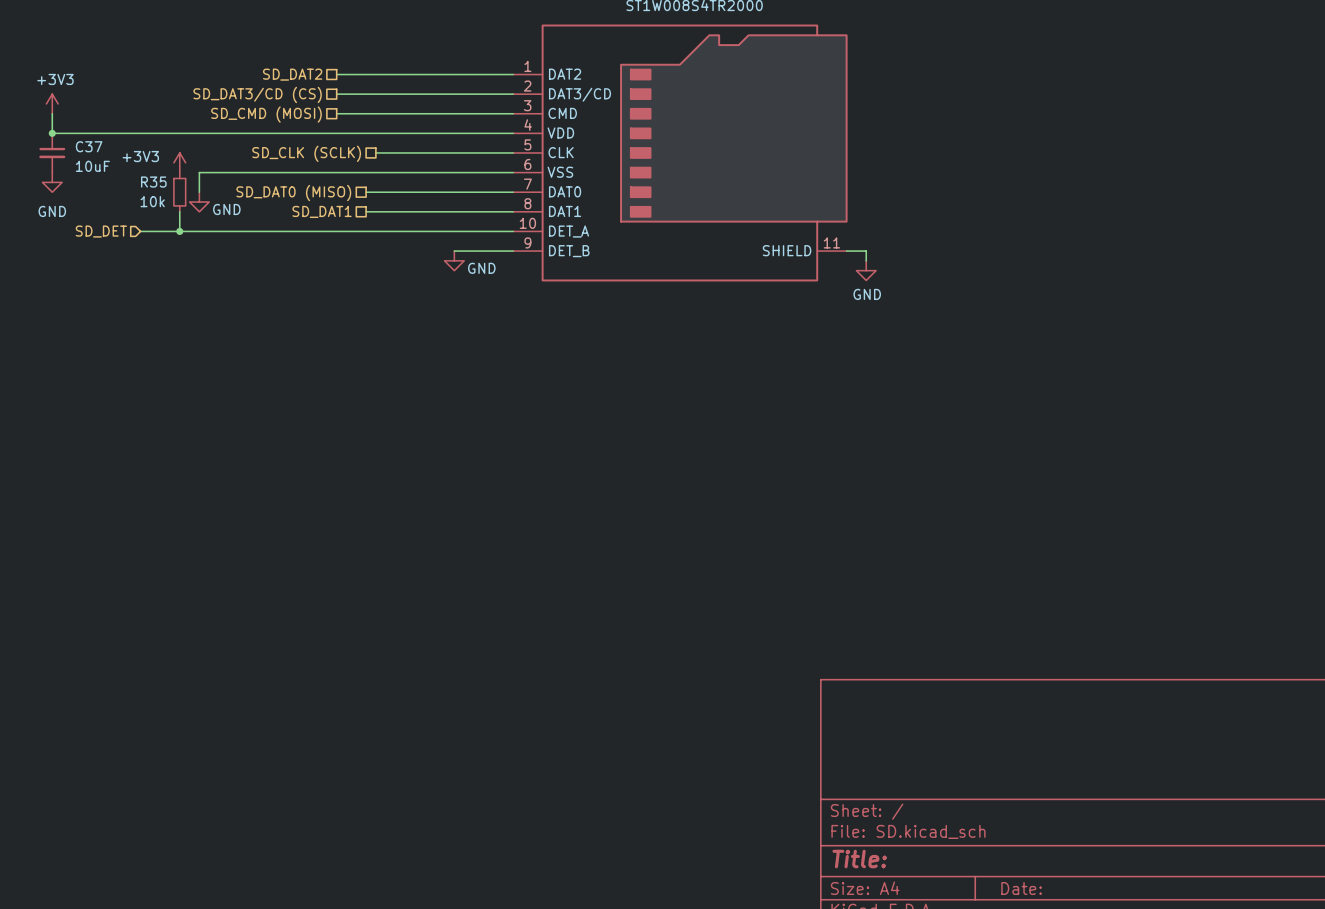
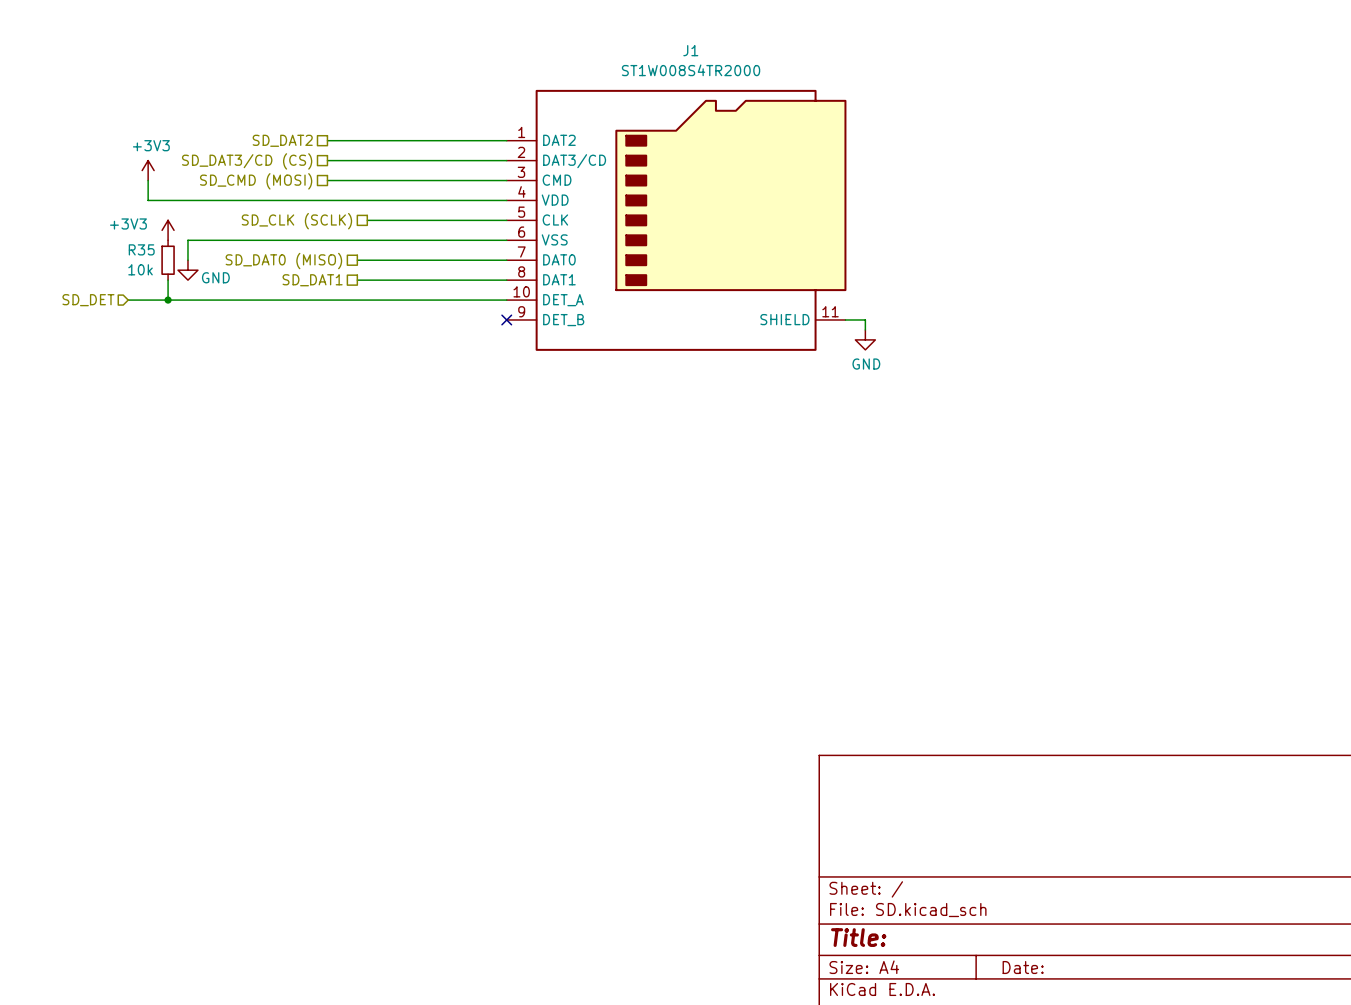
power symbol position: +3V3 (52, 103) -> +3V3 (148, 170)
wire: (52, 113) (52, 133) (160, 133) -> (148, 180) (148, 200)
junction: (52, 133) -> none
C37: 10uF (52, 152) -> none
power symbol: GND (52, 182) -> none
wire: (454, 251) (513, 251) -> none
no-connect mark: none -> (506, 319)
power symbol: GND (454, 260) -> none

